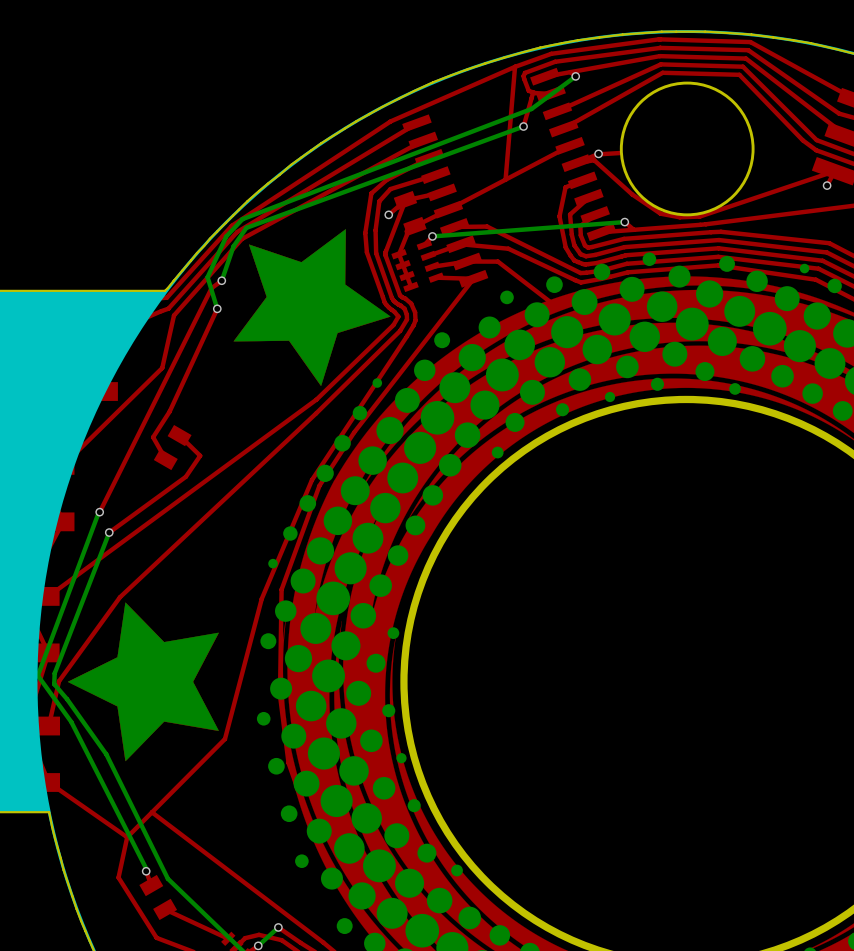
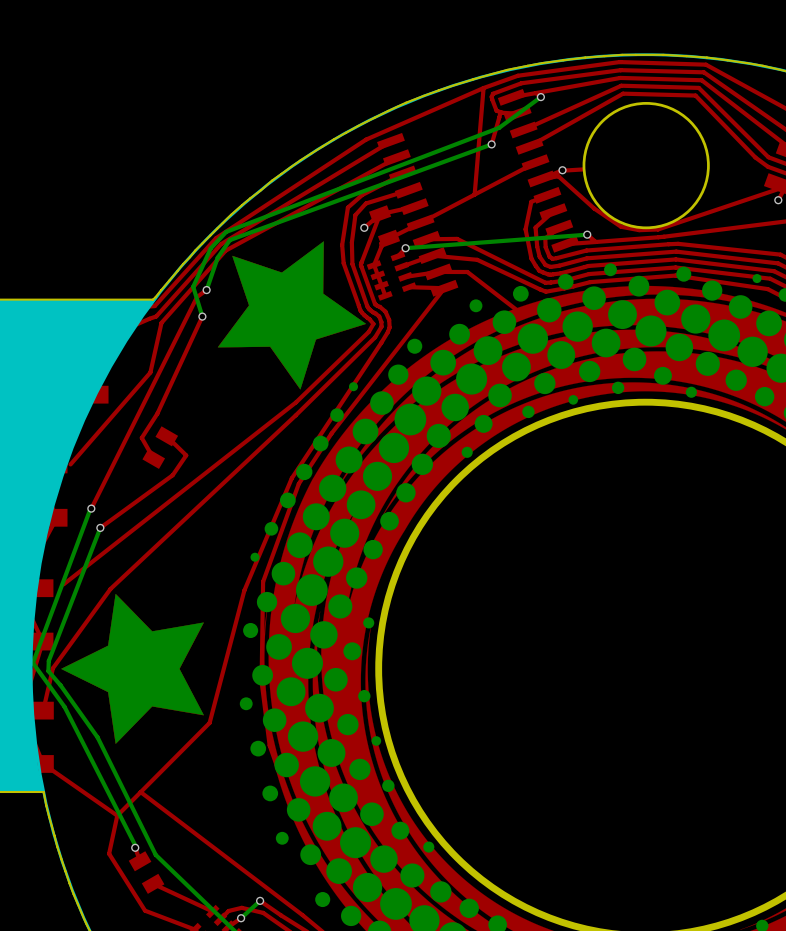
top track: (162, 368) (63, 465) -> (150, 372) (70, 464)
top track: (316, 399) (48, 596) -> (296, 402) (63, 584)

